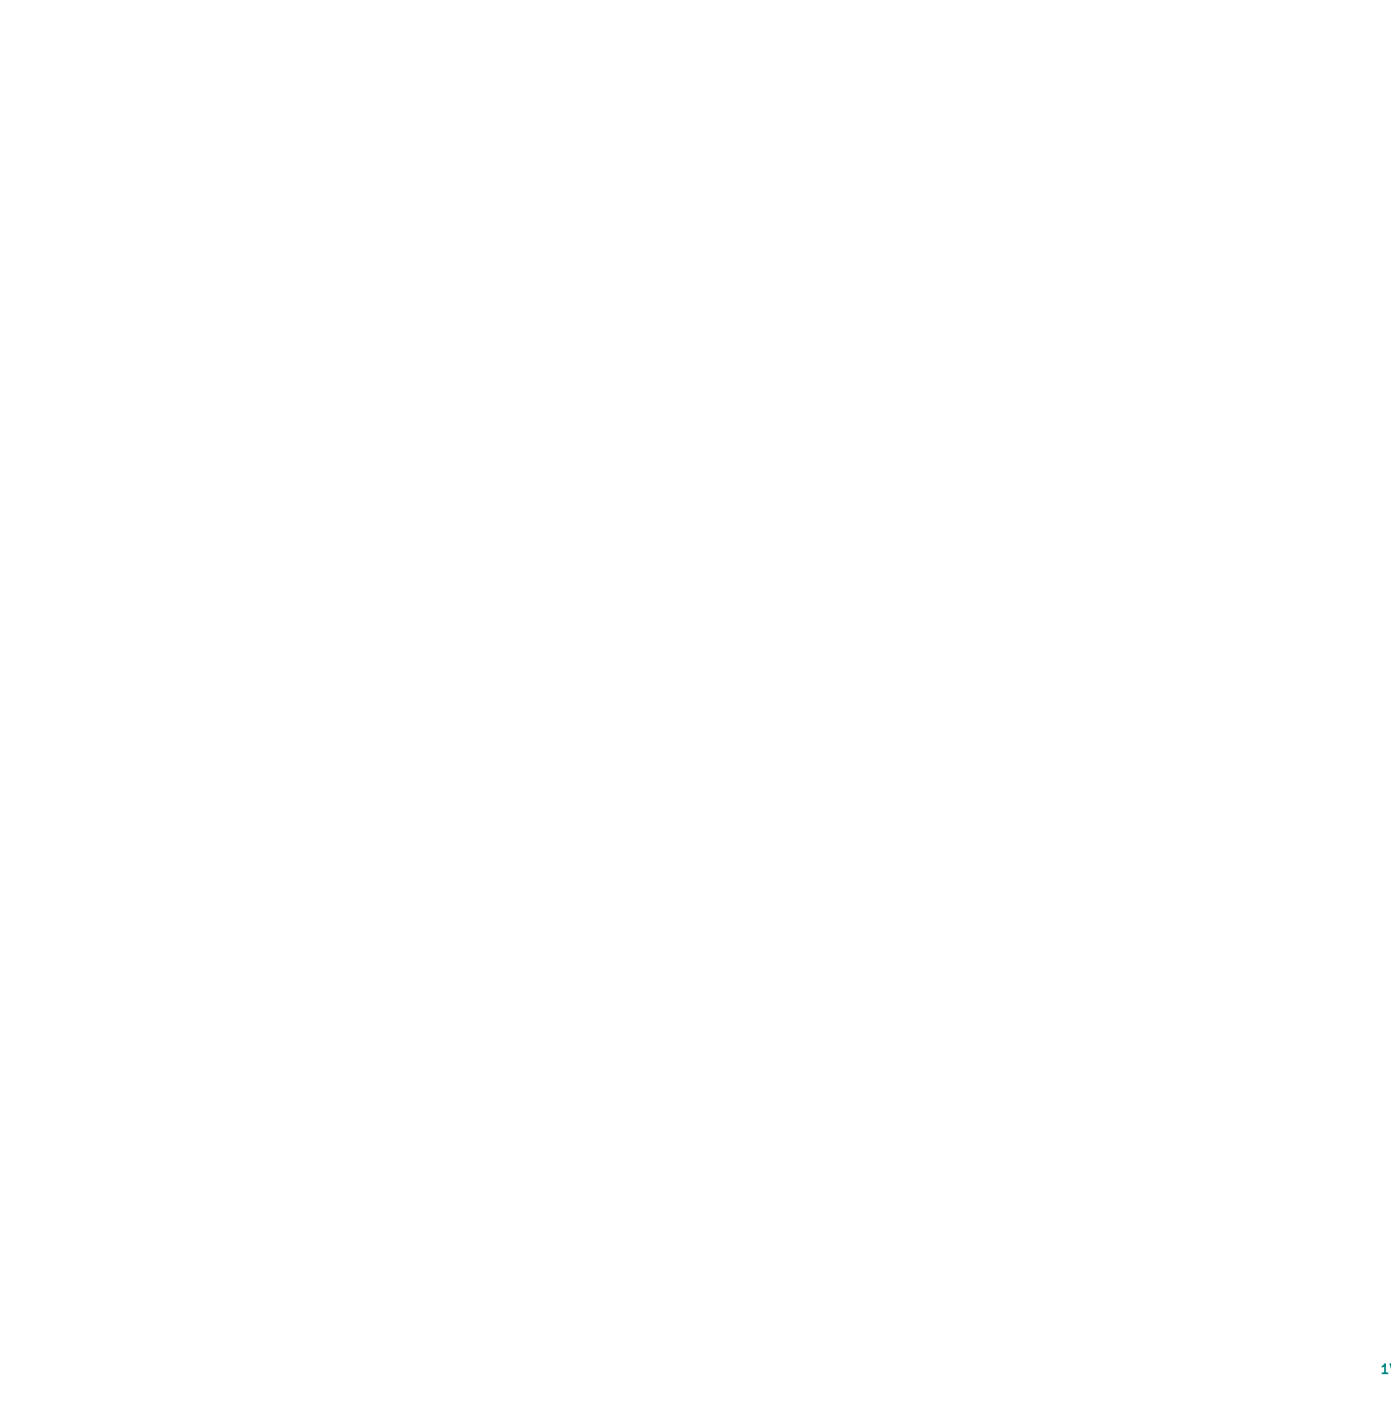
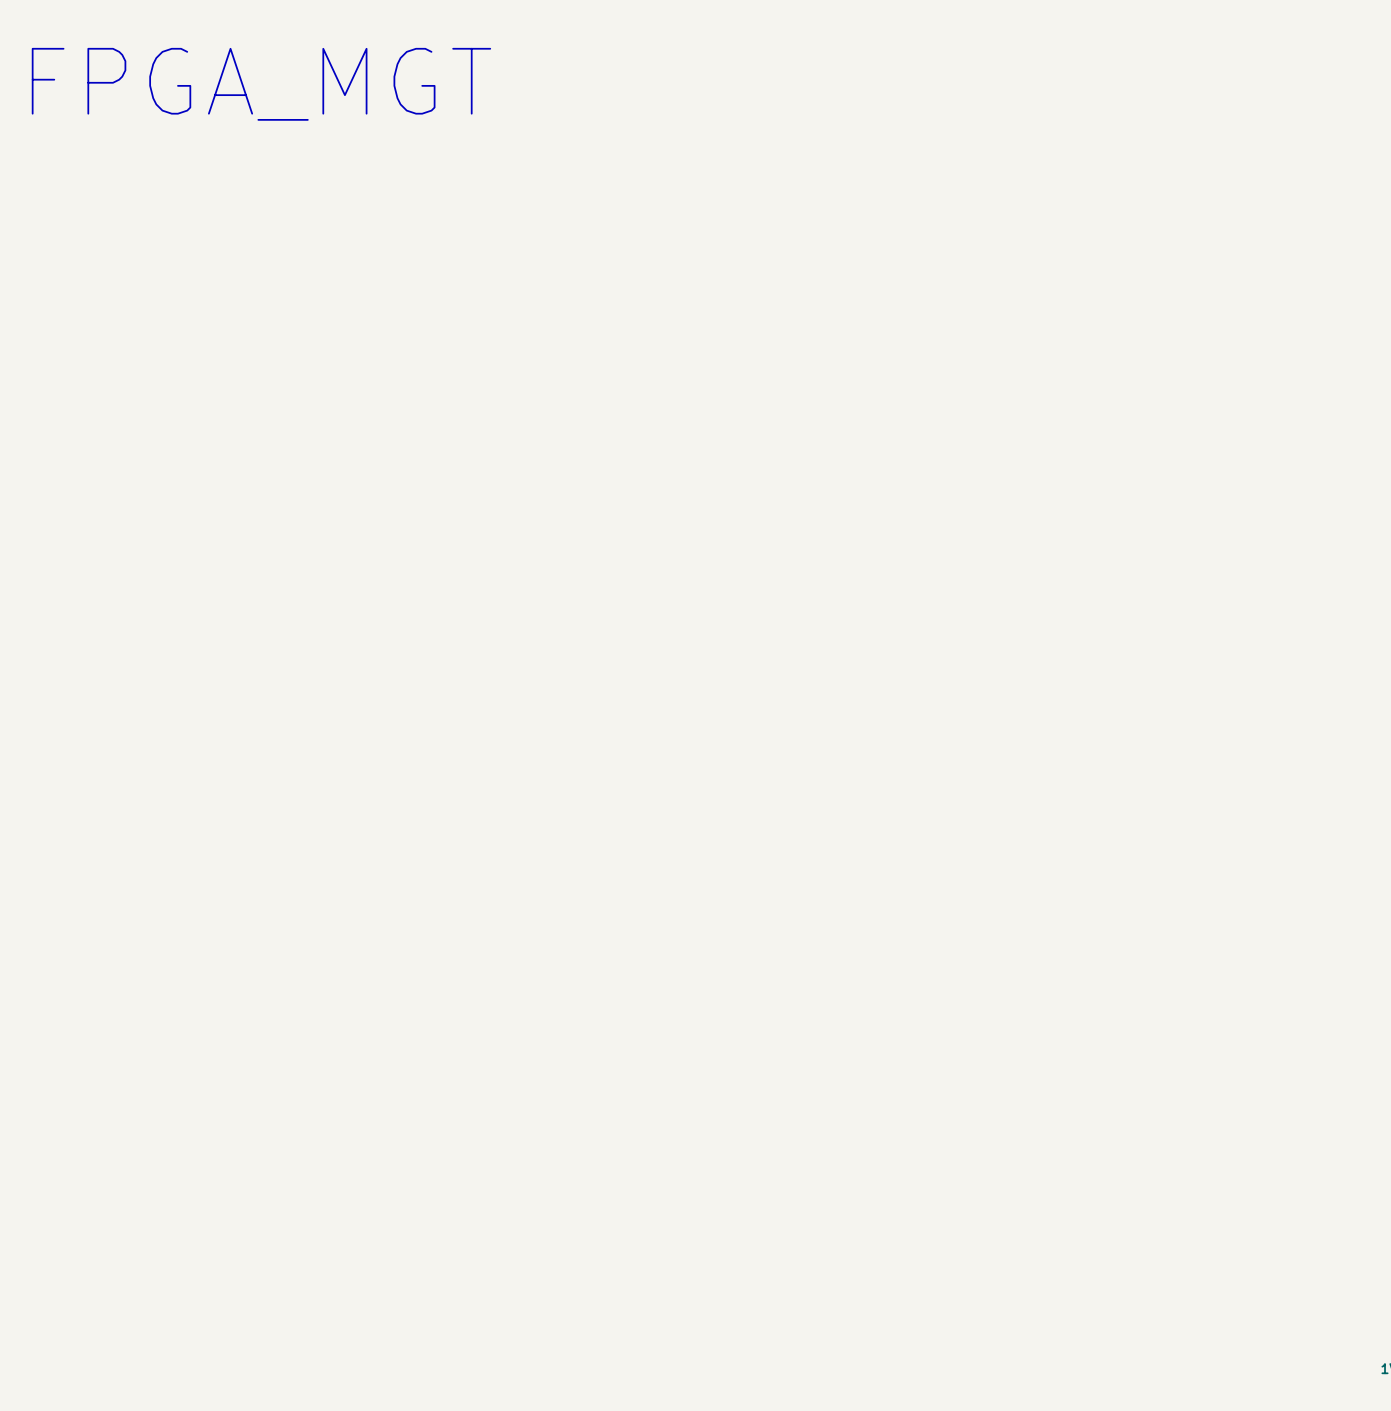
text: none -> FPGA_MGT (261, 84)

